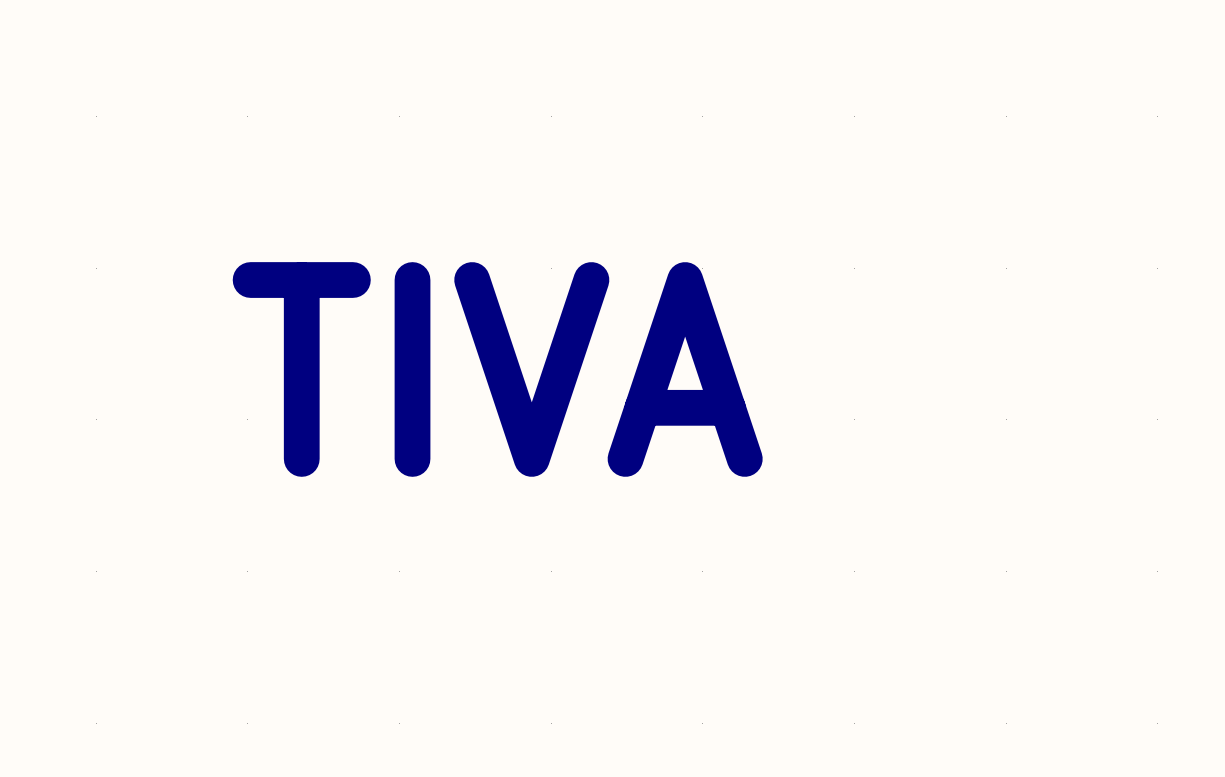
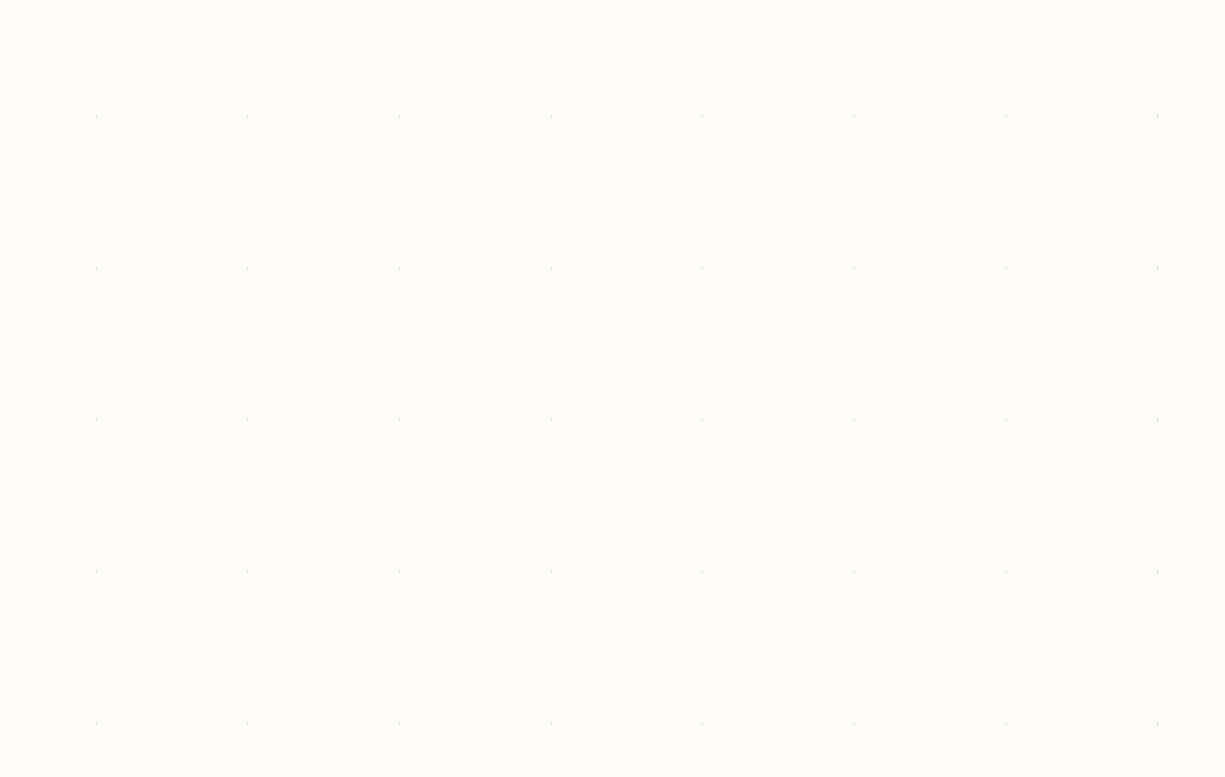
text: TIVA (497, 369) -> none

